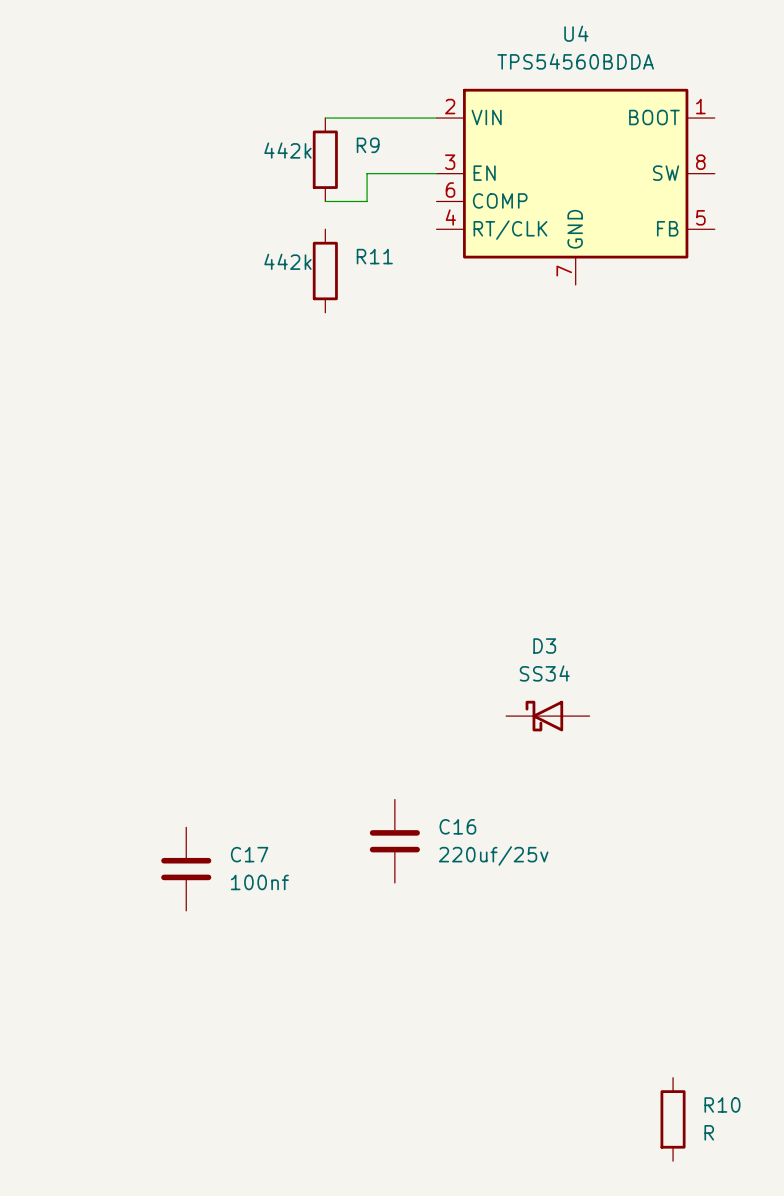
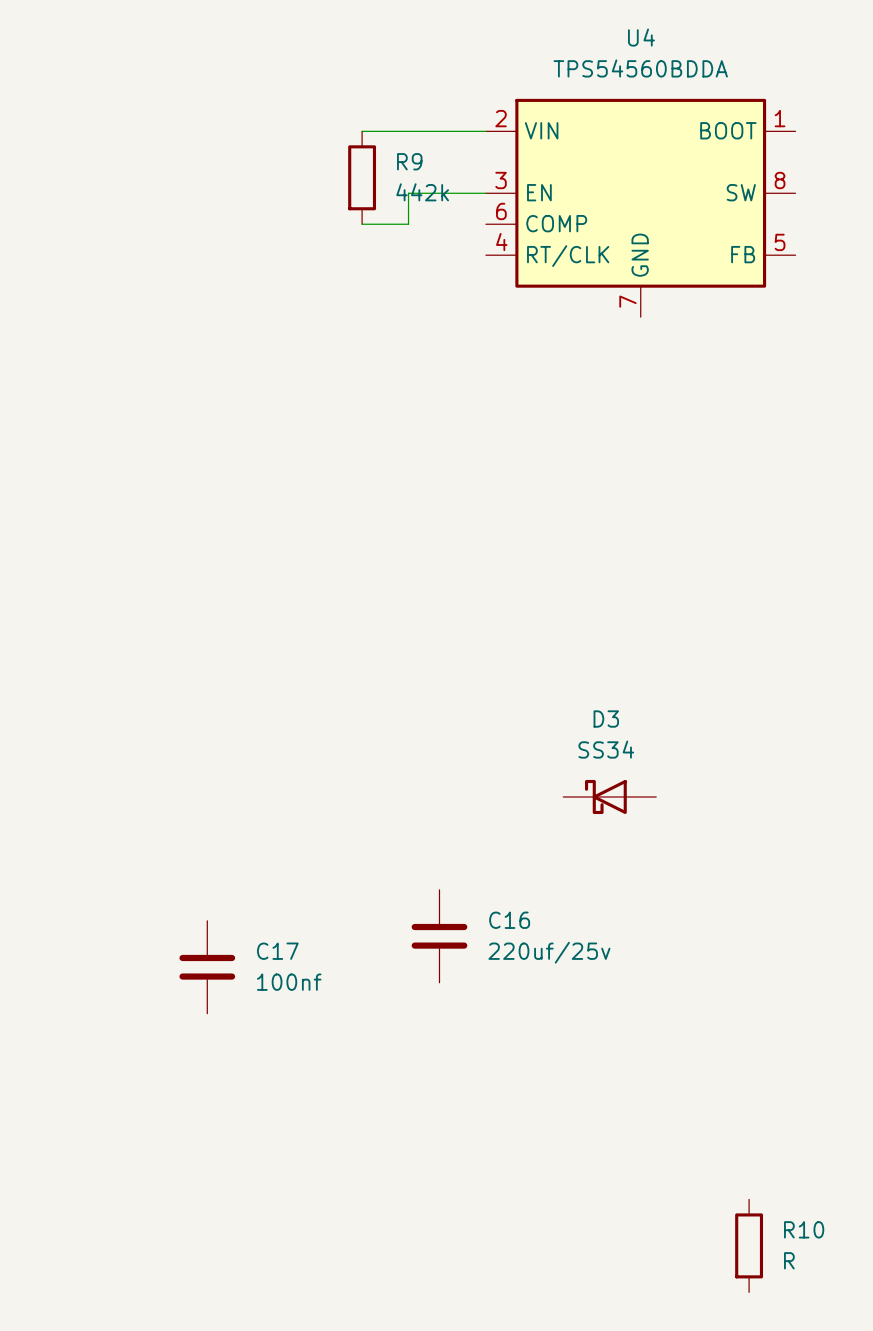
R9 value position: 442k (287, 150) -> 442k (422, 192)
R11: 442k (325, 271) -> none

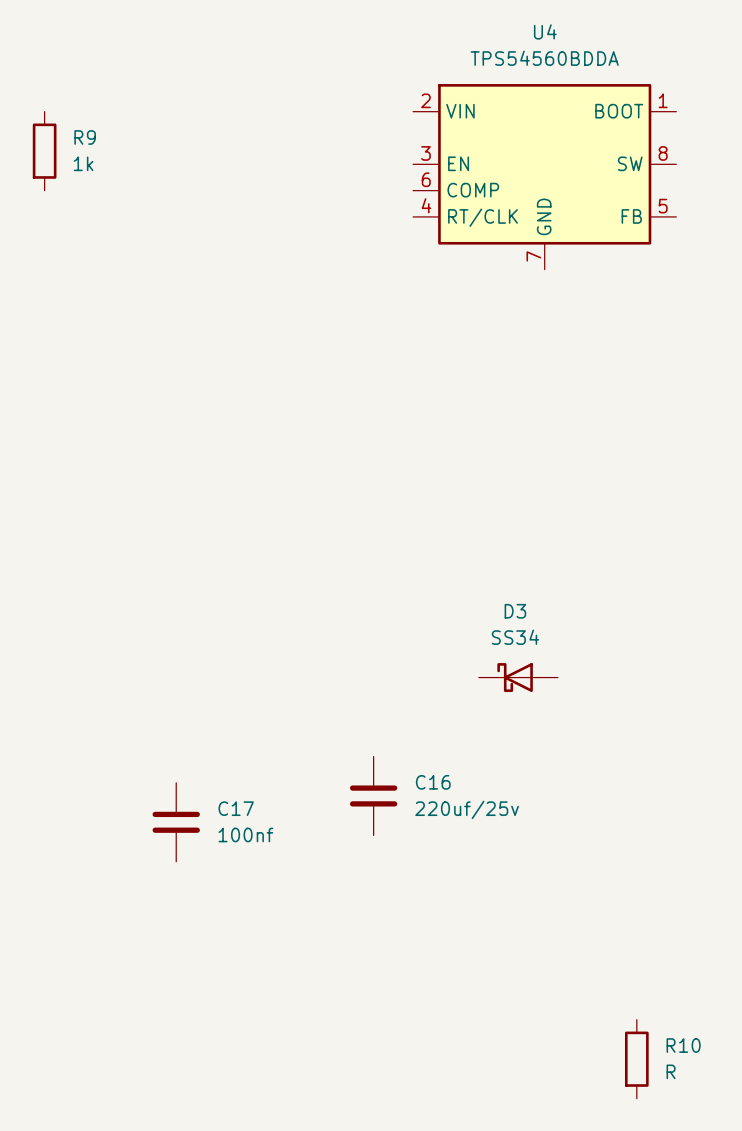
wire: (362, 131) (485, 131) -> none
R9 position: (362, 177) -> (44, 151)
R9 value: 442k (422, 192) -> 1k (83, 163)
wire: (485, 193) (408, 193) (408, 224) (362, 224) -> none

